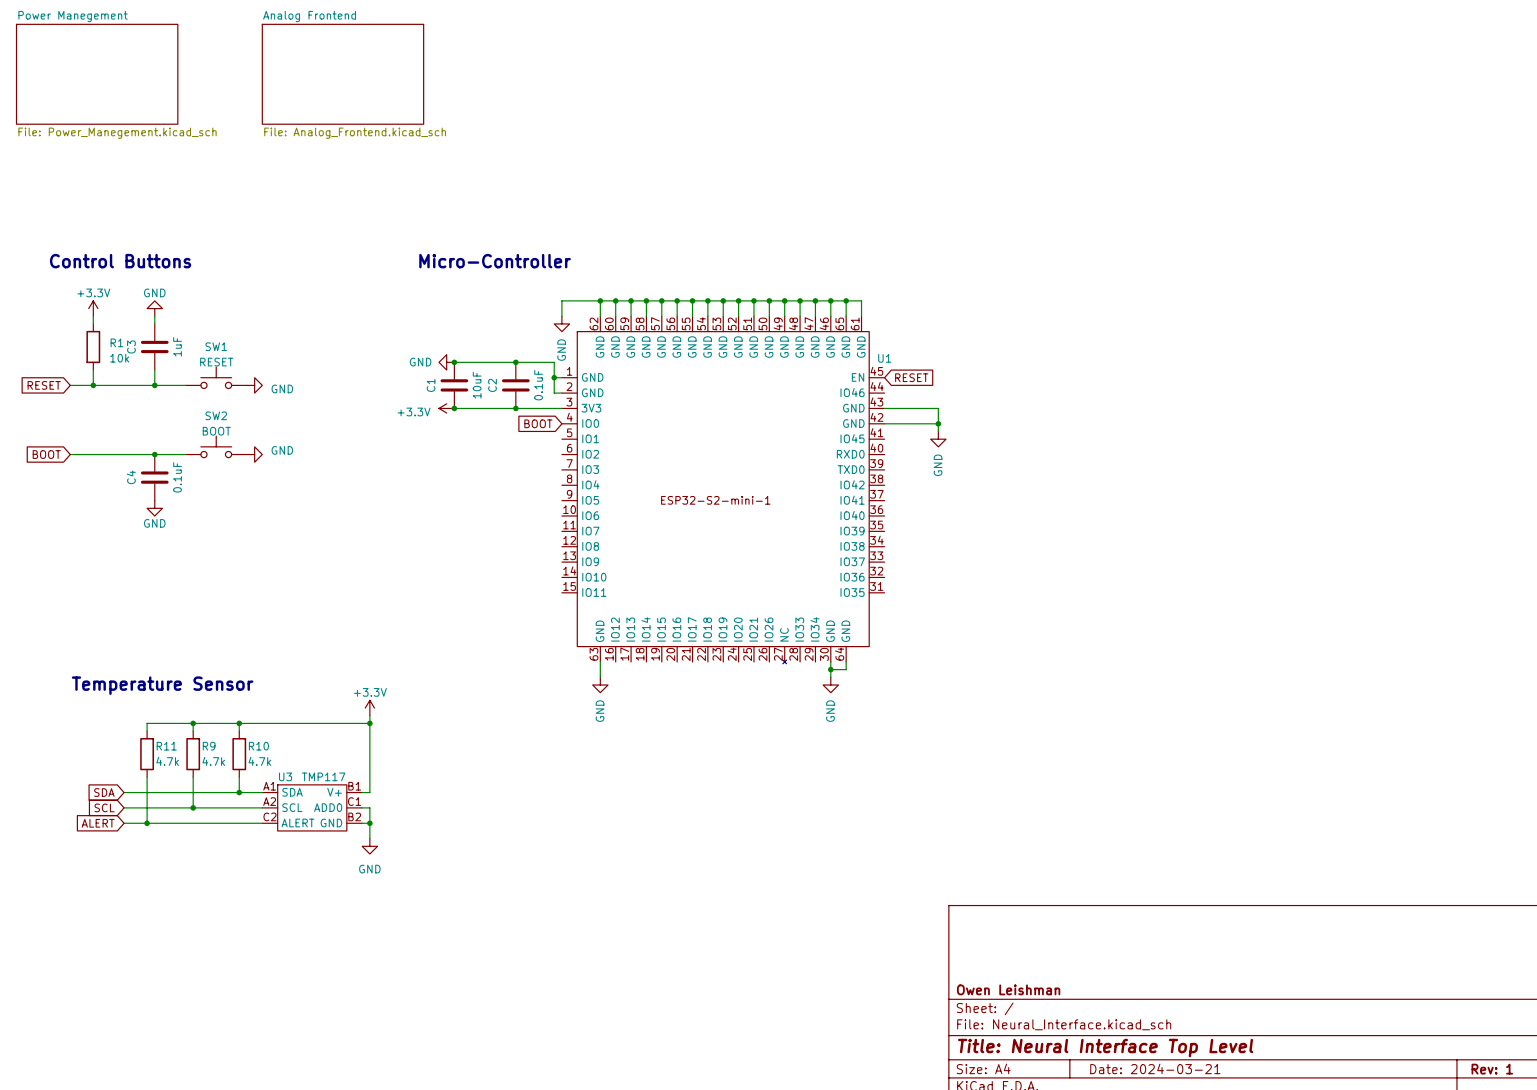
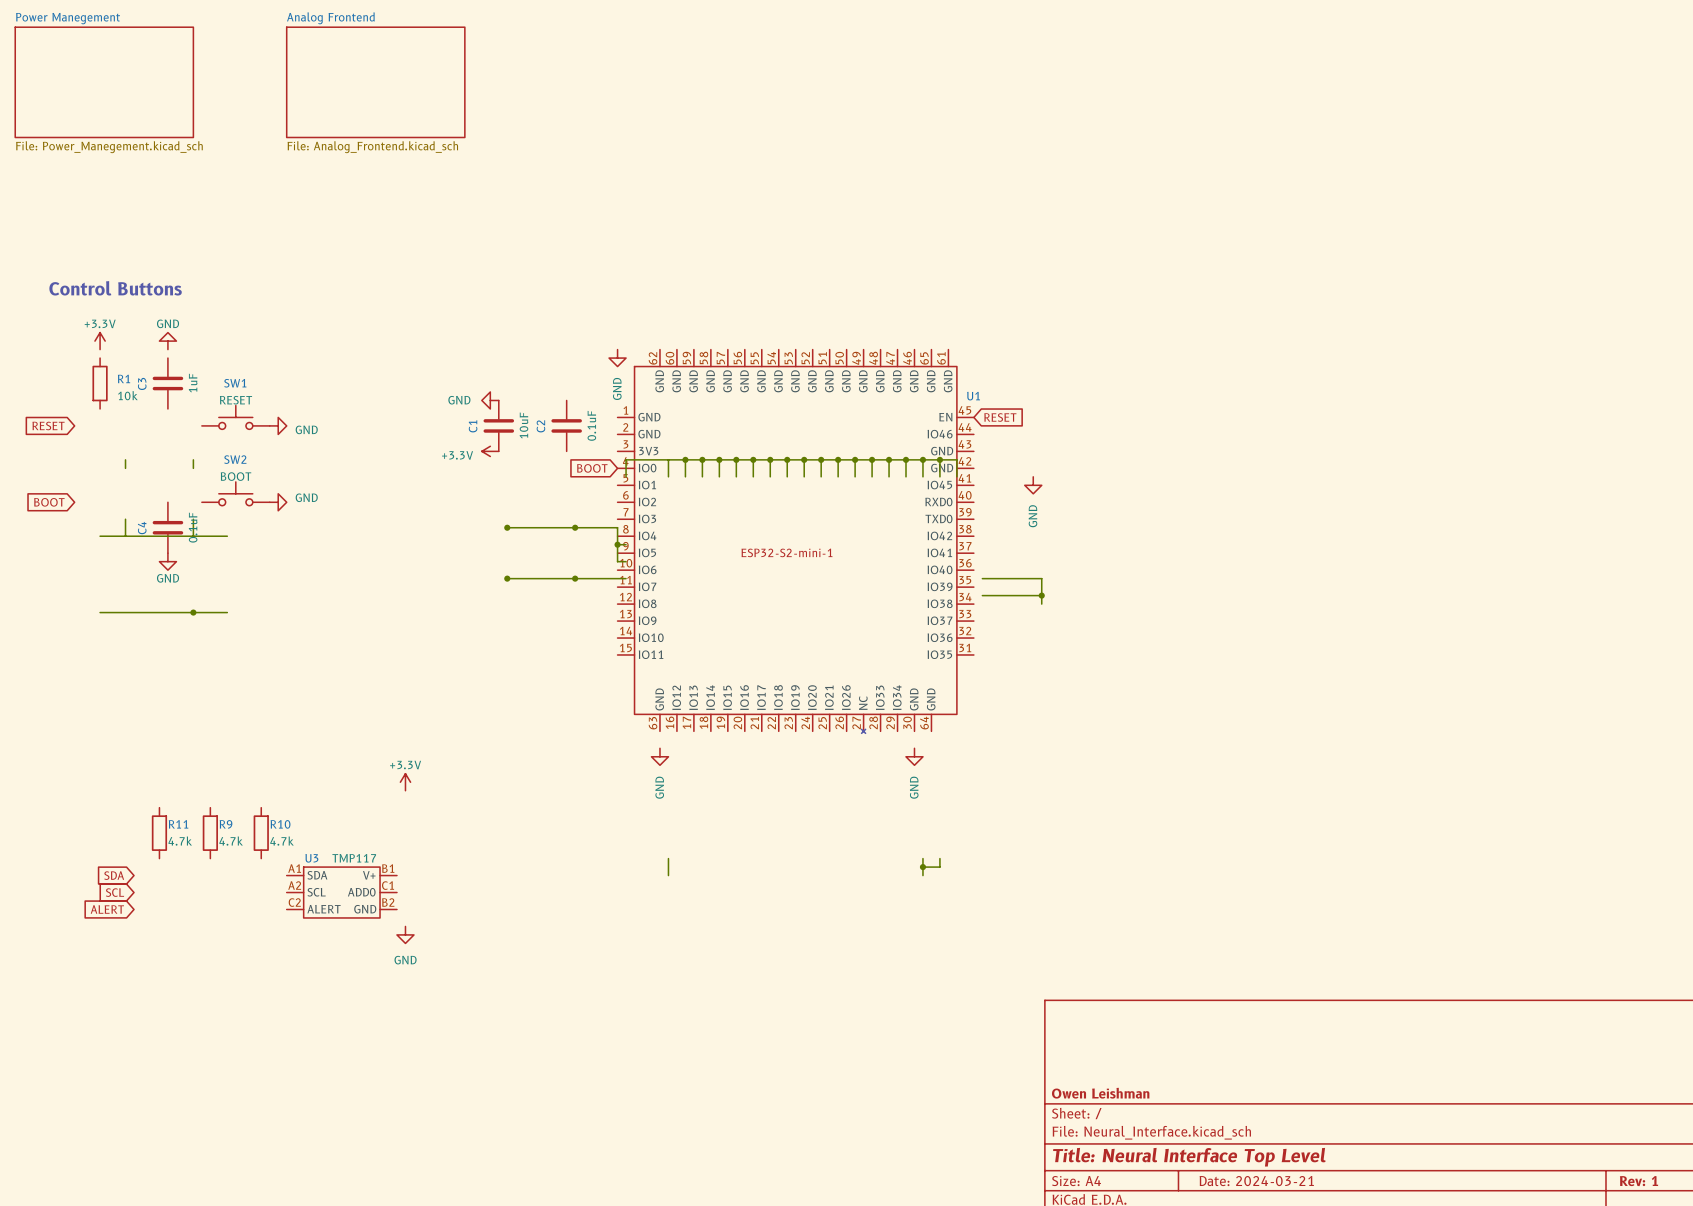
text: Micro-Controller (495, 261) -> none
wire: (600, 300) (600, 316) -> (668, 459) (668, 476)
junction: (600, 300) -> none
wire: (615, 300) (615, 316) -> (685, 459) (685, 476)
junction: (615, 300) -> none
wire: (631, 300) (631, 316) -> (702, 459) (702, 476)
junction: (631, 300) -> none
wire: (646, 300) (646, 316) -> (719, 459) (719, 476)
junction: (646, 300) -> none
wire: (661, 300) (661, 316) -> (736, 459) (736, 476)
junction: (661, 300) -> none
wire: (677, 300) (677, 316) -> (753, 459) (753, 476)
junction: (677, 300) -> none
wire: (692, 300) (692, 316) -> (770, 459) (770, 476)
junction: (692, 300) -> none
wire: (707, 300) (707, 316) -> (787, 459) (787, 476)
junction: (707, 300) -> none
wire: (723, 300) (723, 316) -> (804, 459) (804, 476)
junction: (723, 300) -> none
wire: (738, 300) (738, 316) -> (821, 459) (821, 476)
junction: (738, 300) -> none
wire: (753, 300) (753, 316) -> (838, 459) (838, 476)
junction: (753, 300) -> none
wire: (769, 300) (769, 316) -> (855, 459) (855, 476)
junction: (769, 300) -> none
wire: (784, 300) (784, 316) -> (872, 459) (872, 476)
junction: (784, 300) -> none
wire: (800, 300) (800, 316) -> (889, 459) (889, 476)
junction: (800, 300) -> none
wire: (815, 300) (815, 316) -> (906, 459) (906, 476)
junction: (815, 300) -> none
wire: (830, 300) (830, 316) -> (922, 459) (922, 476)
junction: (830, 300) -> none
wire: (846, 300) (846, 316) -> (939, 459) (939, 476)
junction: (846, 300) -> none
wire: (93, 316) (93, 323) -> (125, 459) (125, 468)
wire: (154, 316) (154, 323) -> (193, 459) (193, 468)
wire: (561, 316) (561, 300) (861, 300) (861, 316) -> (626, 476) (626, 459) (956, 459) (956, 476)
wire: (454, 362) (554, 362) (554, 393) (561, 393) -> (507, 527) (617, 527) (617, 561) (626, 561)
junction: (454, 362) -> none
junction: (515, 362) -> none
wire: (93, 370) (93, 385) -> (125, 519) (125, 536)
wire: (154, 370) (154, 385) -> (193, 519) (193, 536)
wire: (554, 377) (561, 377) -> (617, 544) (626, 544)
junction: (554, 377) -> none
wire: (70, 385) (185, 385) -> (100, 536) (227, 536)
junction: (93, 385) -> none
junction: (154, 385) -> none
wire: (454, 408) (561, 408) -> (507, 578) (626, 578)
junction: (454, 408) -> none
junction: (515, 408) -> none
wire: (884, 408) (938, 408) (938, 431) -> (982, 578) (1041, 578) (1041, 604)
junction: none -> (685, 459)
junction: none -> (702, 459)
junction: none -> (719, 459)
junction: none -> (736, 459)
junction: none -> (753, 459)
junction: none -> (770, 459)
junction: none -> (787, 459)
junction: none -> (804, 459)
junction: none -> (821, 459)
junction: none -> (838, 459)
junction: none -> (855, 459)
junction: none -> (872, 459)
junction: none -> (889, 459)
junction: none -> (906, 459)
junction: none -> (922, 459)
junction: none -> (939, 459)
wire: (884, 423) (938, 423) -> (982, 595) (1041, 595)
junction: (938, 423) -> none
wire: (70, 454) (185, 454) -> (100, 612) (227, 612)
junction: (154, 454) -> none
junction: none -> (507, 527)
junction: none -> (575, 527)
junction: none -> (617, 544)
junction: none -> (507, 578)
junction: none -> (575, 578)
junction: none -> (1041, 595)
junction: none -> (193, 612)
wire: (600, 661) (600, 677) -> (668, 858) (668, 875)
wire: (830, 661) (830, 677) -> (922, 858) (922, 875)
wire: (846, 661) (846, 669) (830, 669) -> (939, 858) (939, 867) (922, 867)
junction: (830, 669) -> none
text: Temperature Sensor (162, 685) -> none
wire: (369, 715) (369, 792) (362, 792) -> none
wire: (193, 723) (193, 731) -> none
junction: (193, 723) -> none
wire: (239, 723) (239, 731) -> none
junction: (239, 723) -> none
wire: (369, 723) (147, 723) (147, 731) -> none
junction: (369, 723) -> none
wire: (147, 777) (147, 823) -> none
wire: (193, 777) (193, 807) -> none
wire: (239, 777) (239, 792) -> none
junction: none -> (922, 867)
wire: (124, 792) (262, 792) -> none
junction: (239, 792) -> none
wire: (124, 807) (262, 807) -> none
junction: (193, 807) -> none
wire: (362, 807) (369, 807) (369, 838) -> none
wire: (124, 823) (262, 823) -> none
junction: (147, 823) -> none
wire: (362, 823) (369, 823) -> none
junction: (369, 823) -> none

